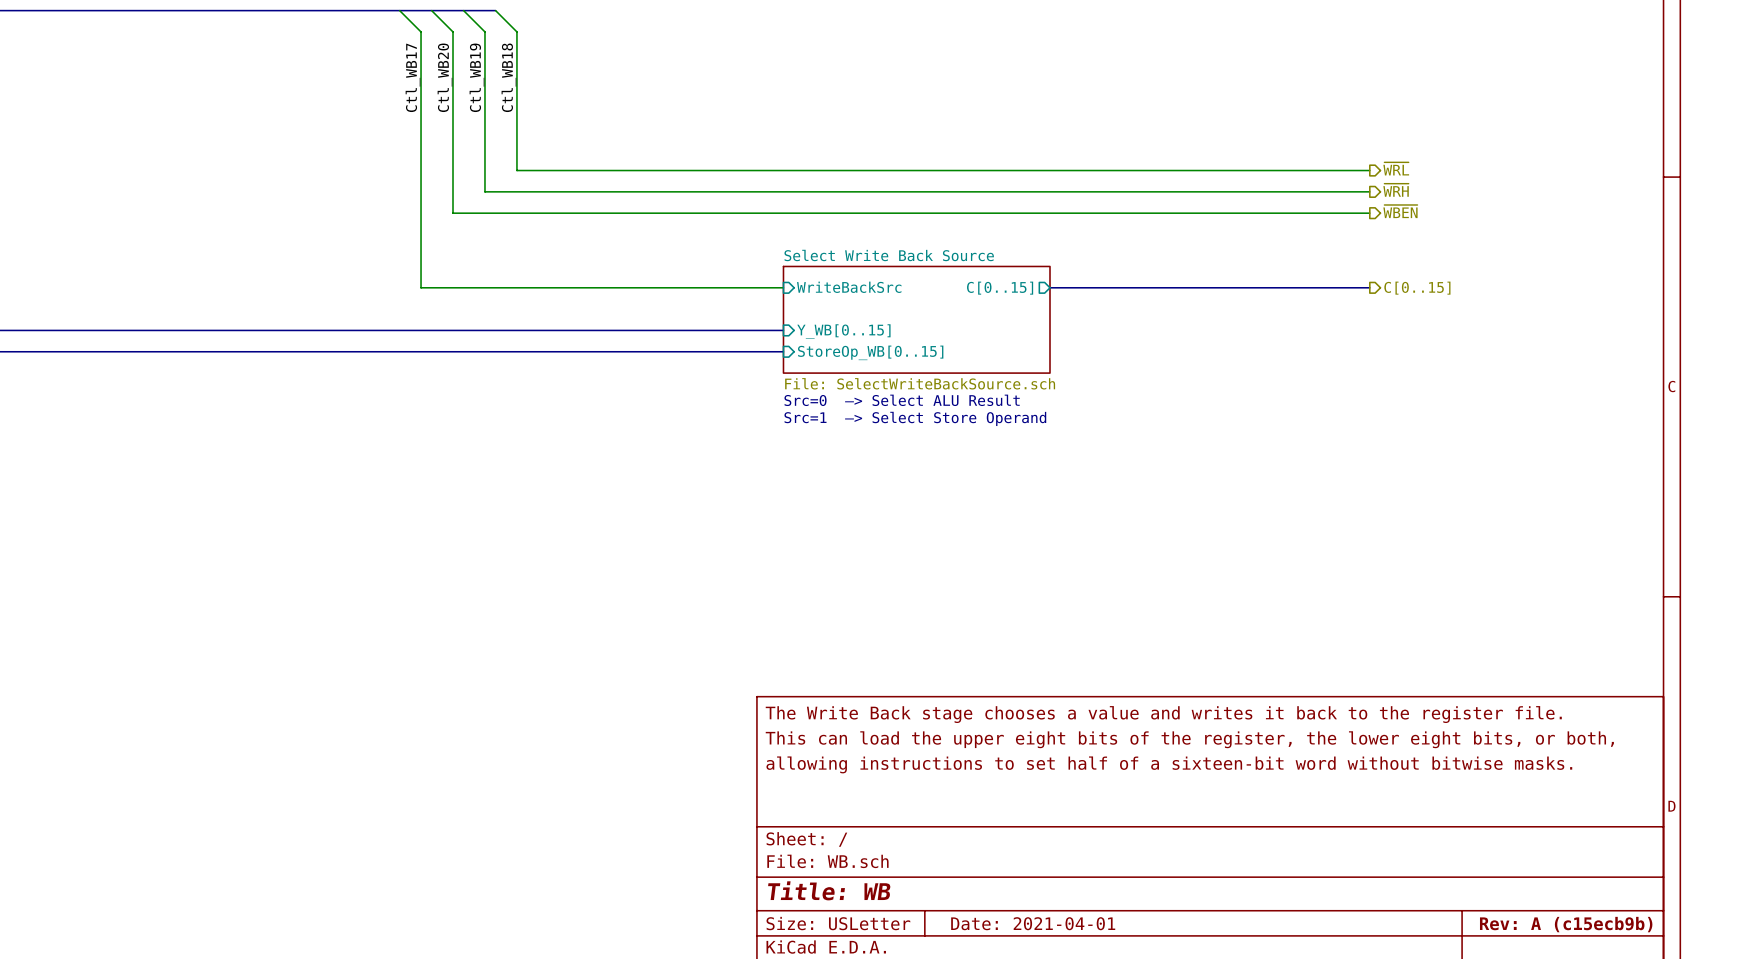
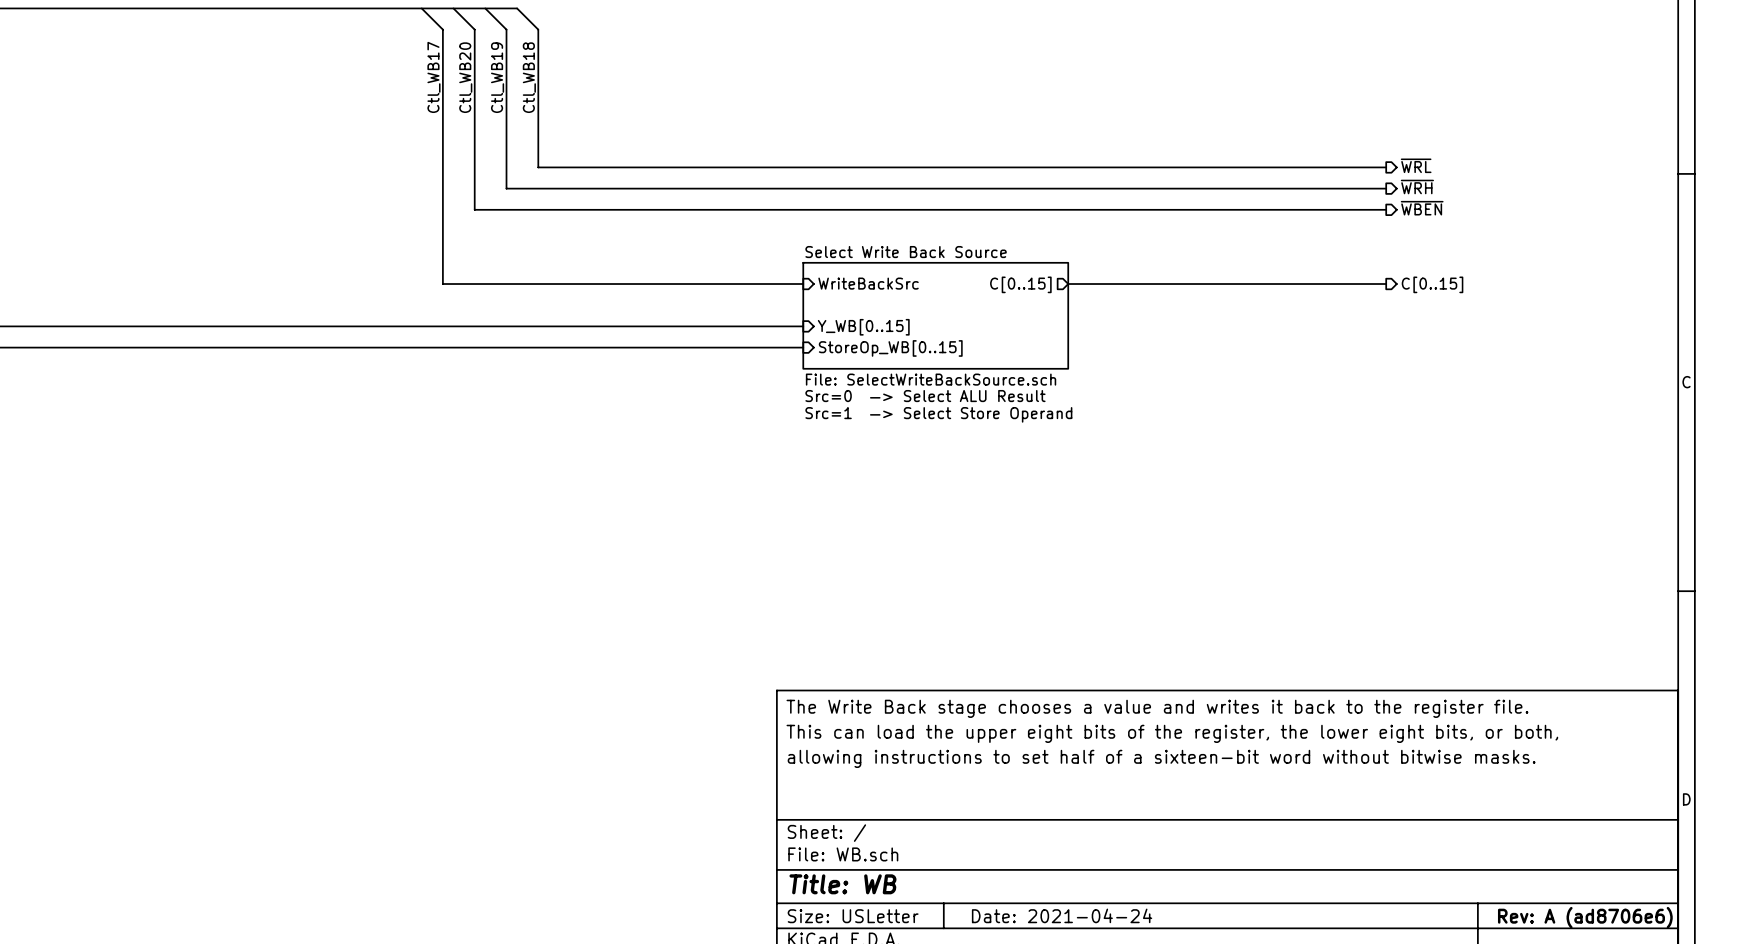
title block: Date: 2021-04-01 (1033, 923) -> Date: 2021-04-24 (1062, 915)
title block: Rev: A (c15ecb9b) (1566, 924) -> Rev: A (ad8706e6) (1585, 917)

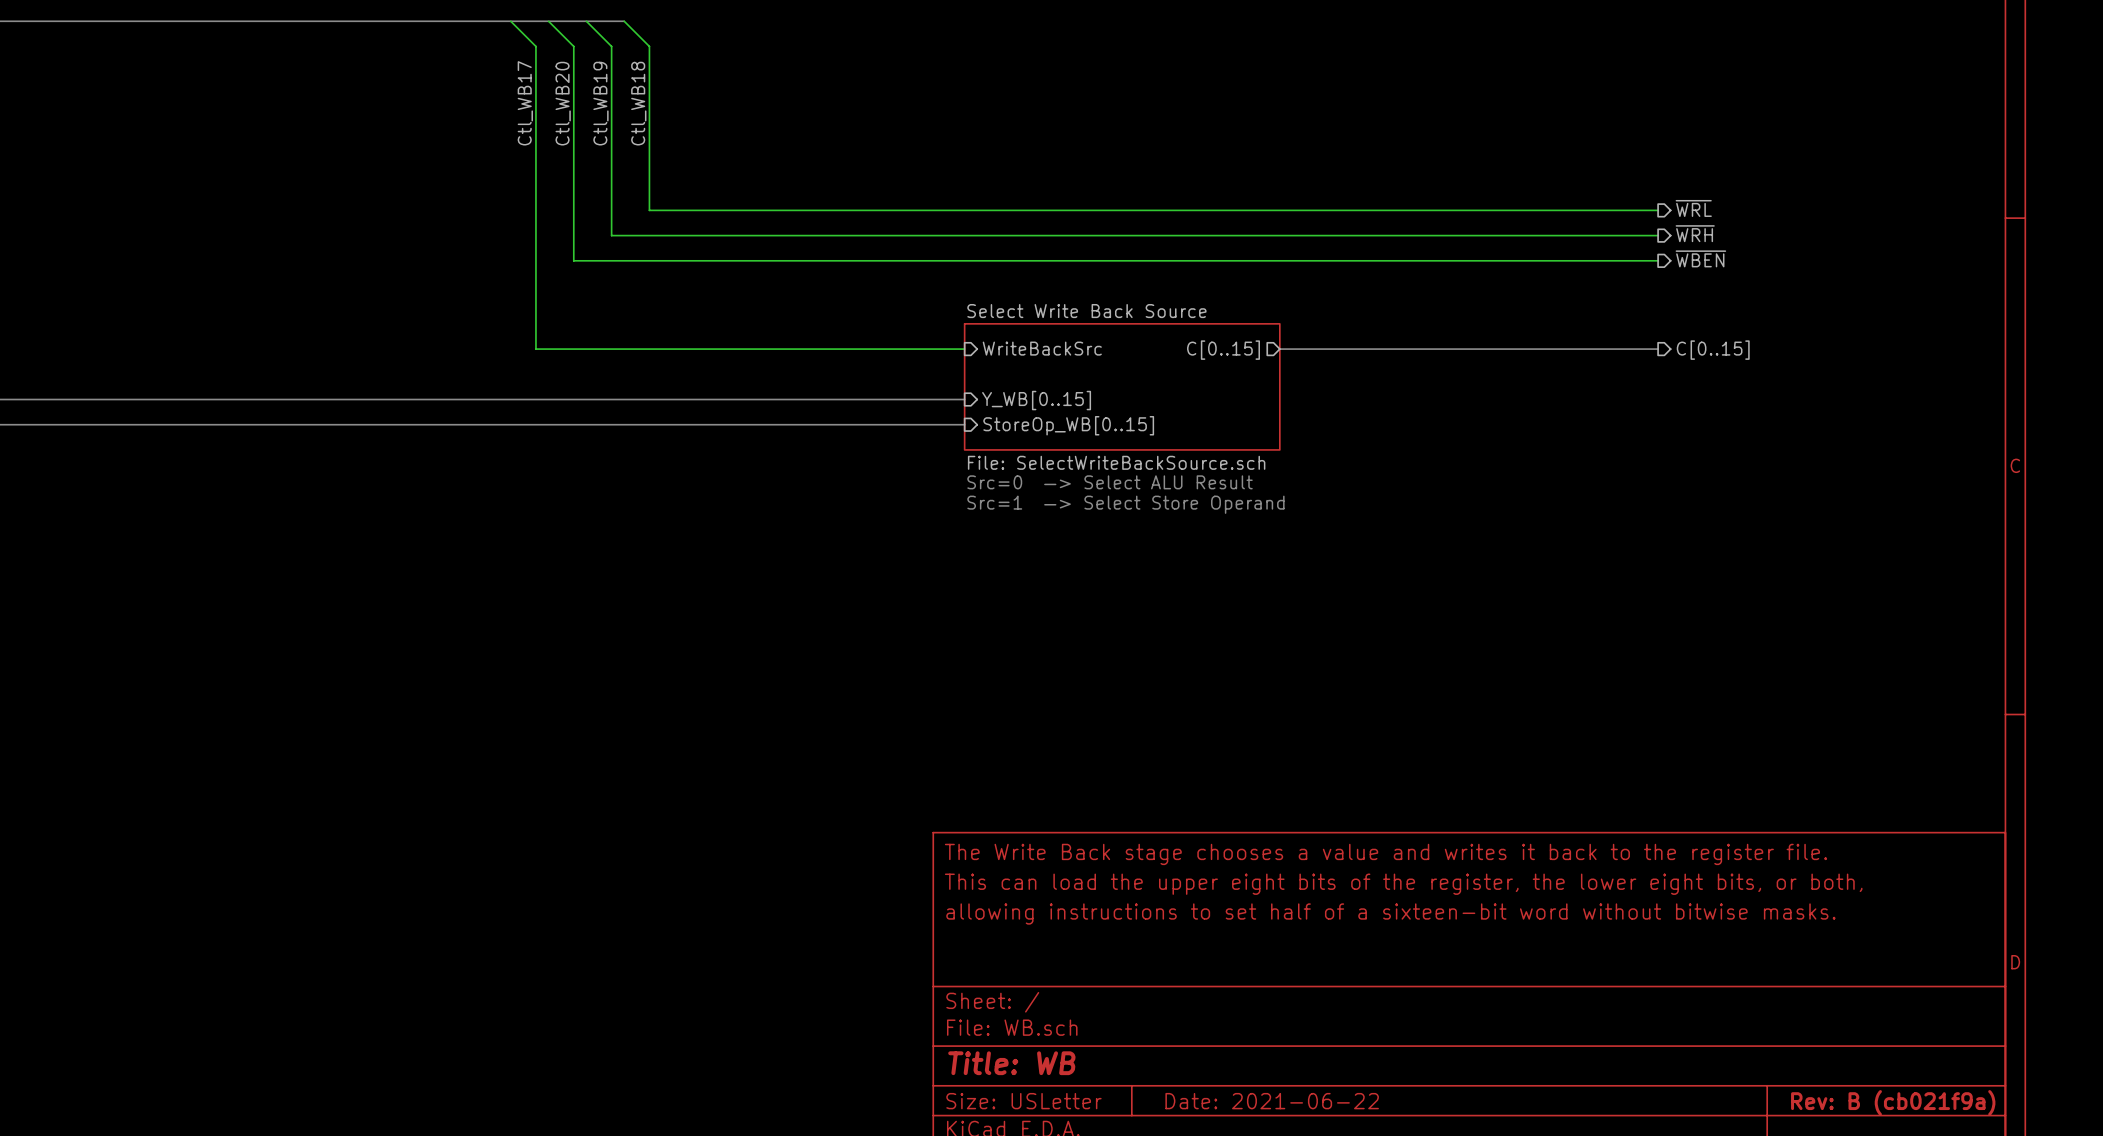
title block: Date: 2021-04-24 (1062, 915) -> Date: 2021-06-22 (1272, 1101)
title block: Rev: A (ad8706e6) (1585, 917) -> Rev: B (cb021f9a) (1893, 1102)

